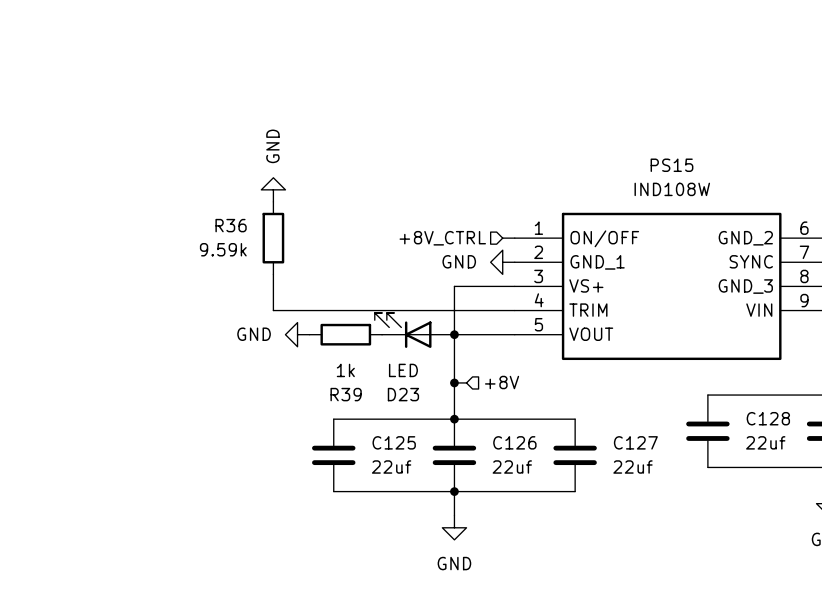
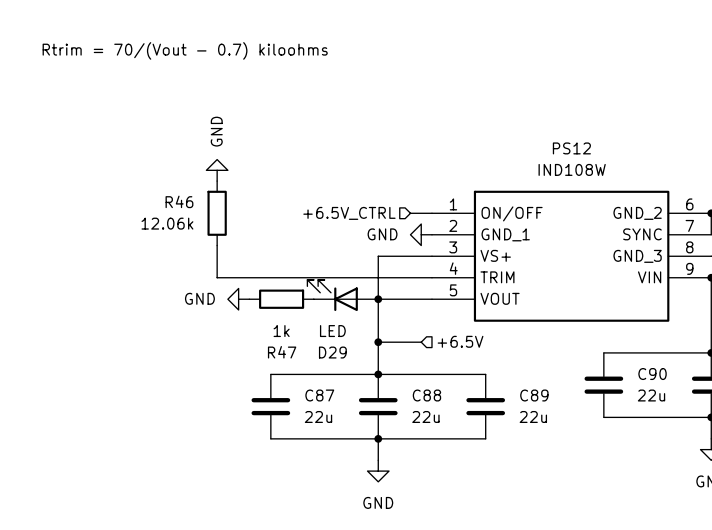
text: none -> Rtrim = 70/(Vout - 0.7) kiloohms (185, 50)
PS15 name: PS15 (671, 165) -> PS12 (571, 148)
R36 name: R36 (231, 225) -> R46 (179, 201)
hierarchical label: +8V_CTRL (442, 238) -> +6.5V_CTRL (349, 213)
wire: none -> (410, 213) (421, 213)
R36 value: 9.59k (223, 249) -> 12.06k (167, 223)
wire: none -> (389, 342) (421, 342)
hierarchical label: +8V (502, 382) -> none
hierarchical label: none -> +6.5V (460, 341)
R39 name: R39 (346, 394) -> R47 (282, 352)
D23 name: D23 (403, 394) -> D29 (332, 352)
C128 name: C128 (768, 418) -> C90 (652, 374)
C125 name: C125 (394, 442) -> C87 (319, 395)
C126 name: C126 (514, 442) -> C88 (426, 395)
C127 name: C127 (635, 442) -> C89 (534, 395)
C128 value: 22uf (765, 442) -> 22u (651, 395)
C125 value: 22uf (391, 466) -> 22u (318, 416)
C126 value: 22uf (512, 466) -> 22u (425, 416)
C127 value: 22uf (632, 466) -> 22u (533, 416)

